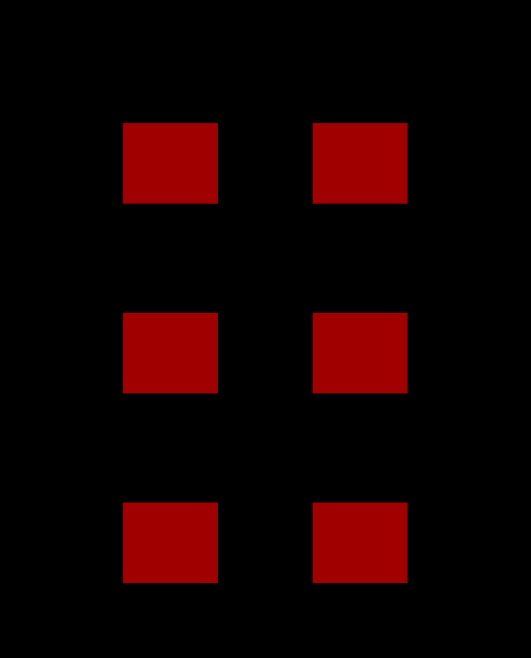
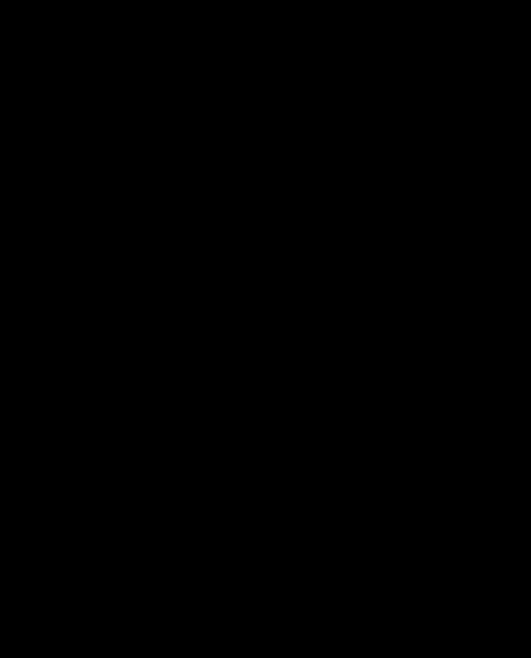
part: (265, 163) -> none
part: (265, 353) -> none
part: (265, 542) -> none

